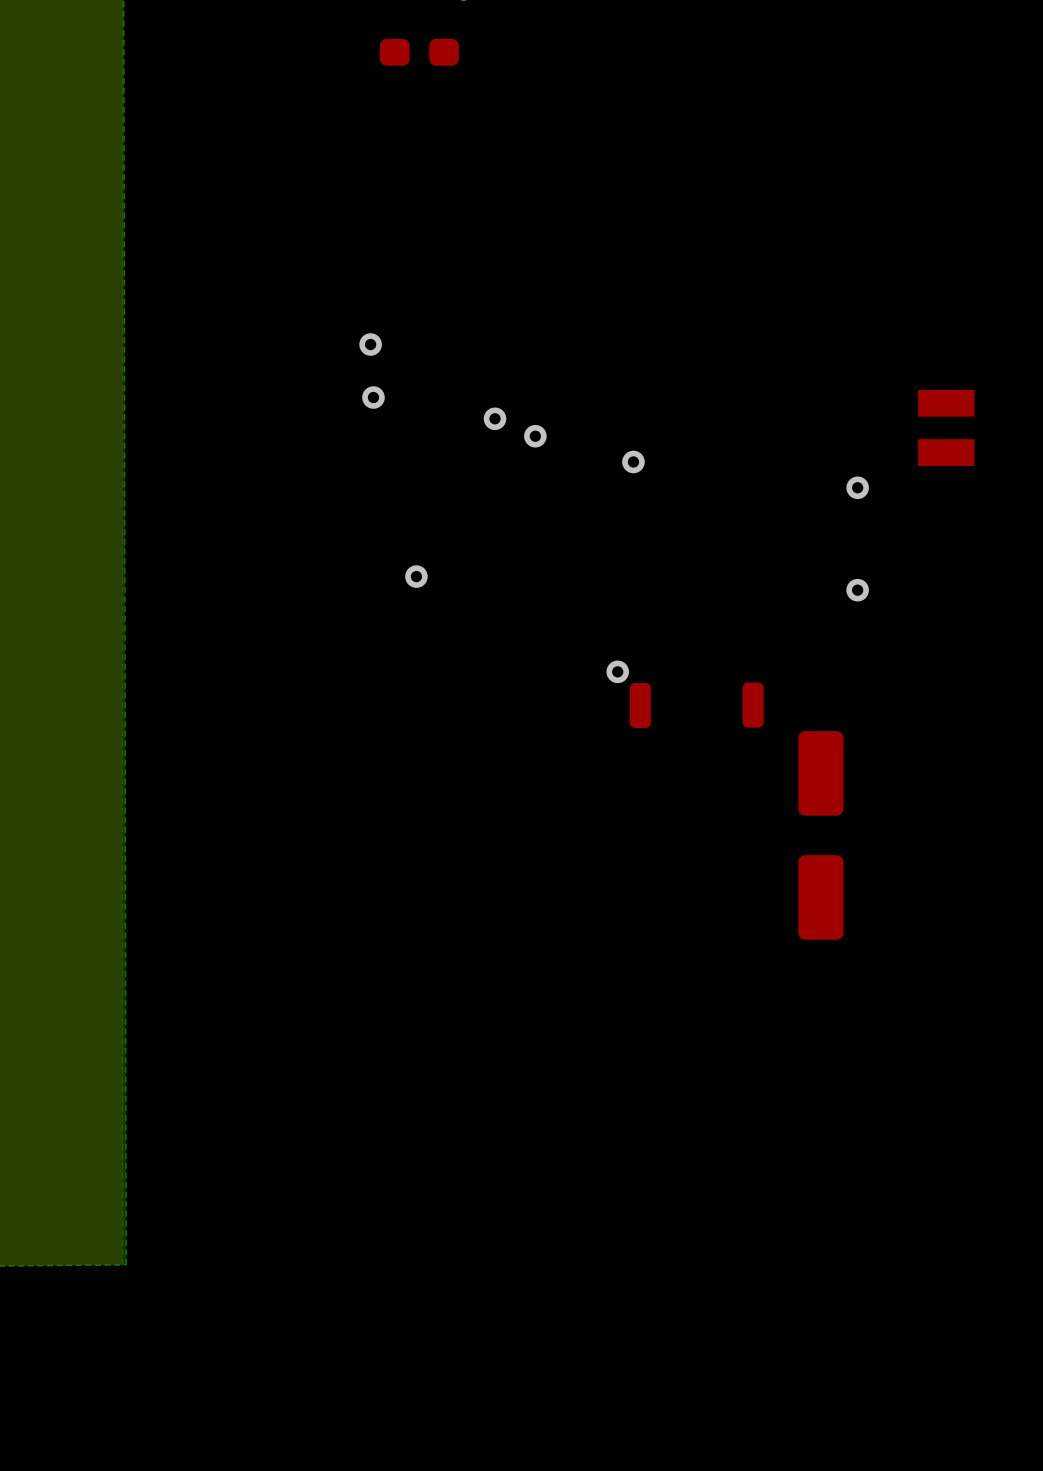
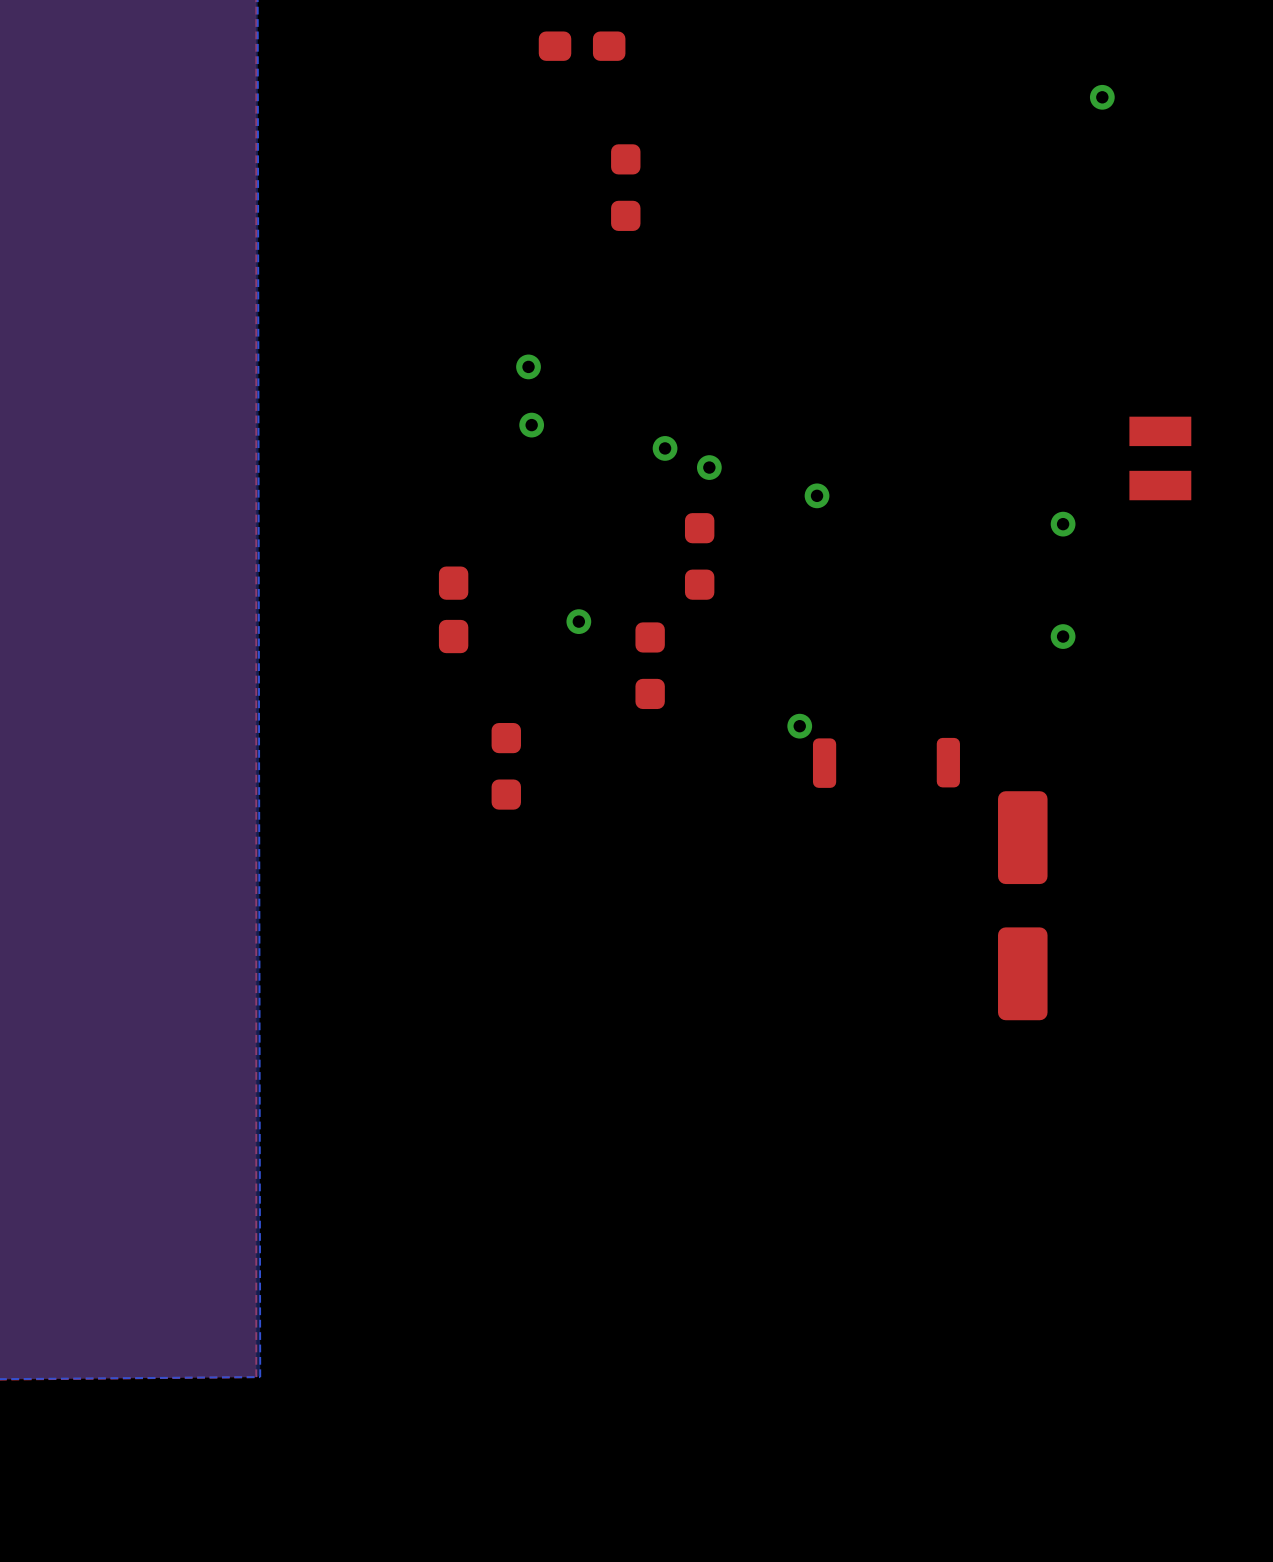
via: none -> (1102, 97)
part: none -> (625, 187)
part: none -> (699, 556)
part: none -> (453, 609)
part: none -> (650, 665)
part: none -> (506, 766)

